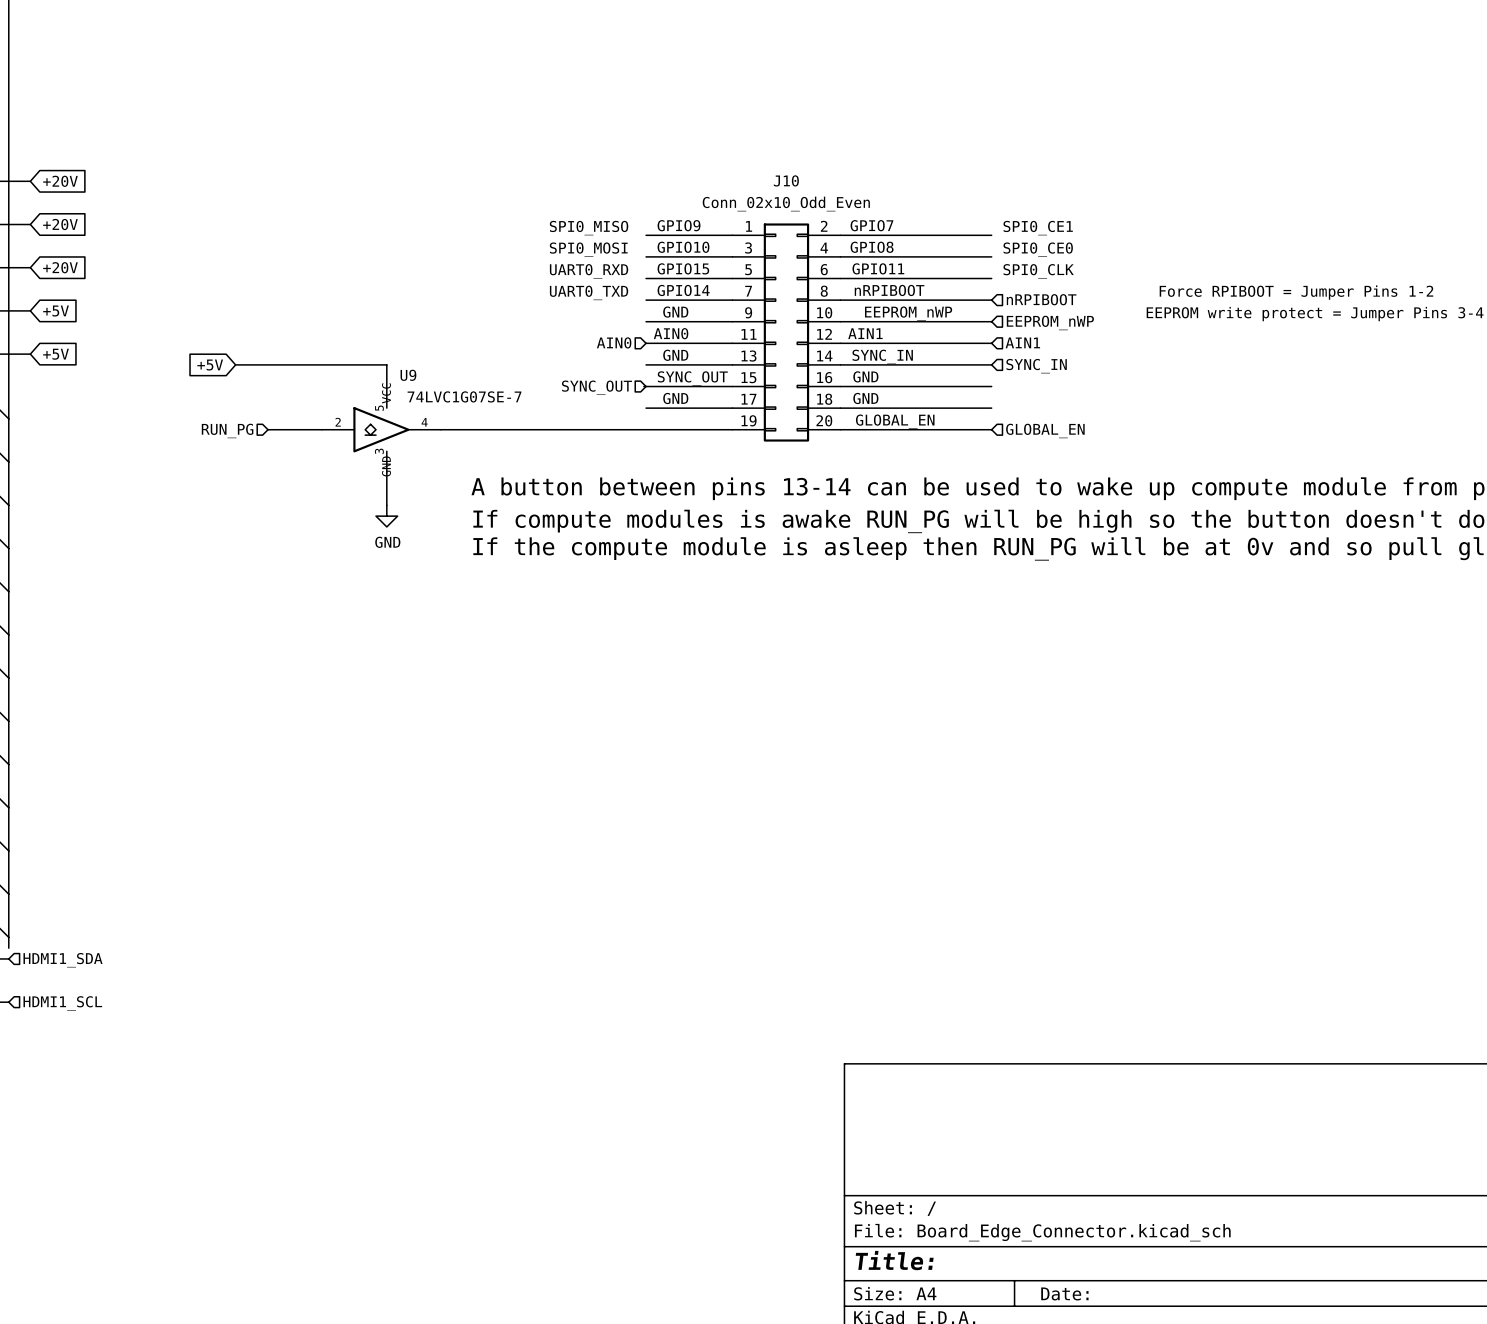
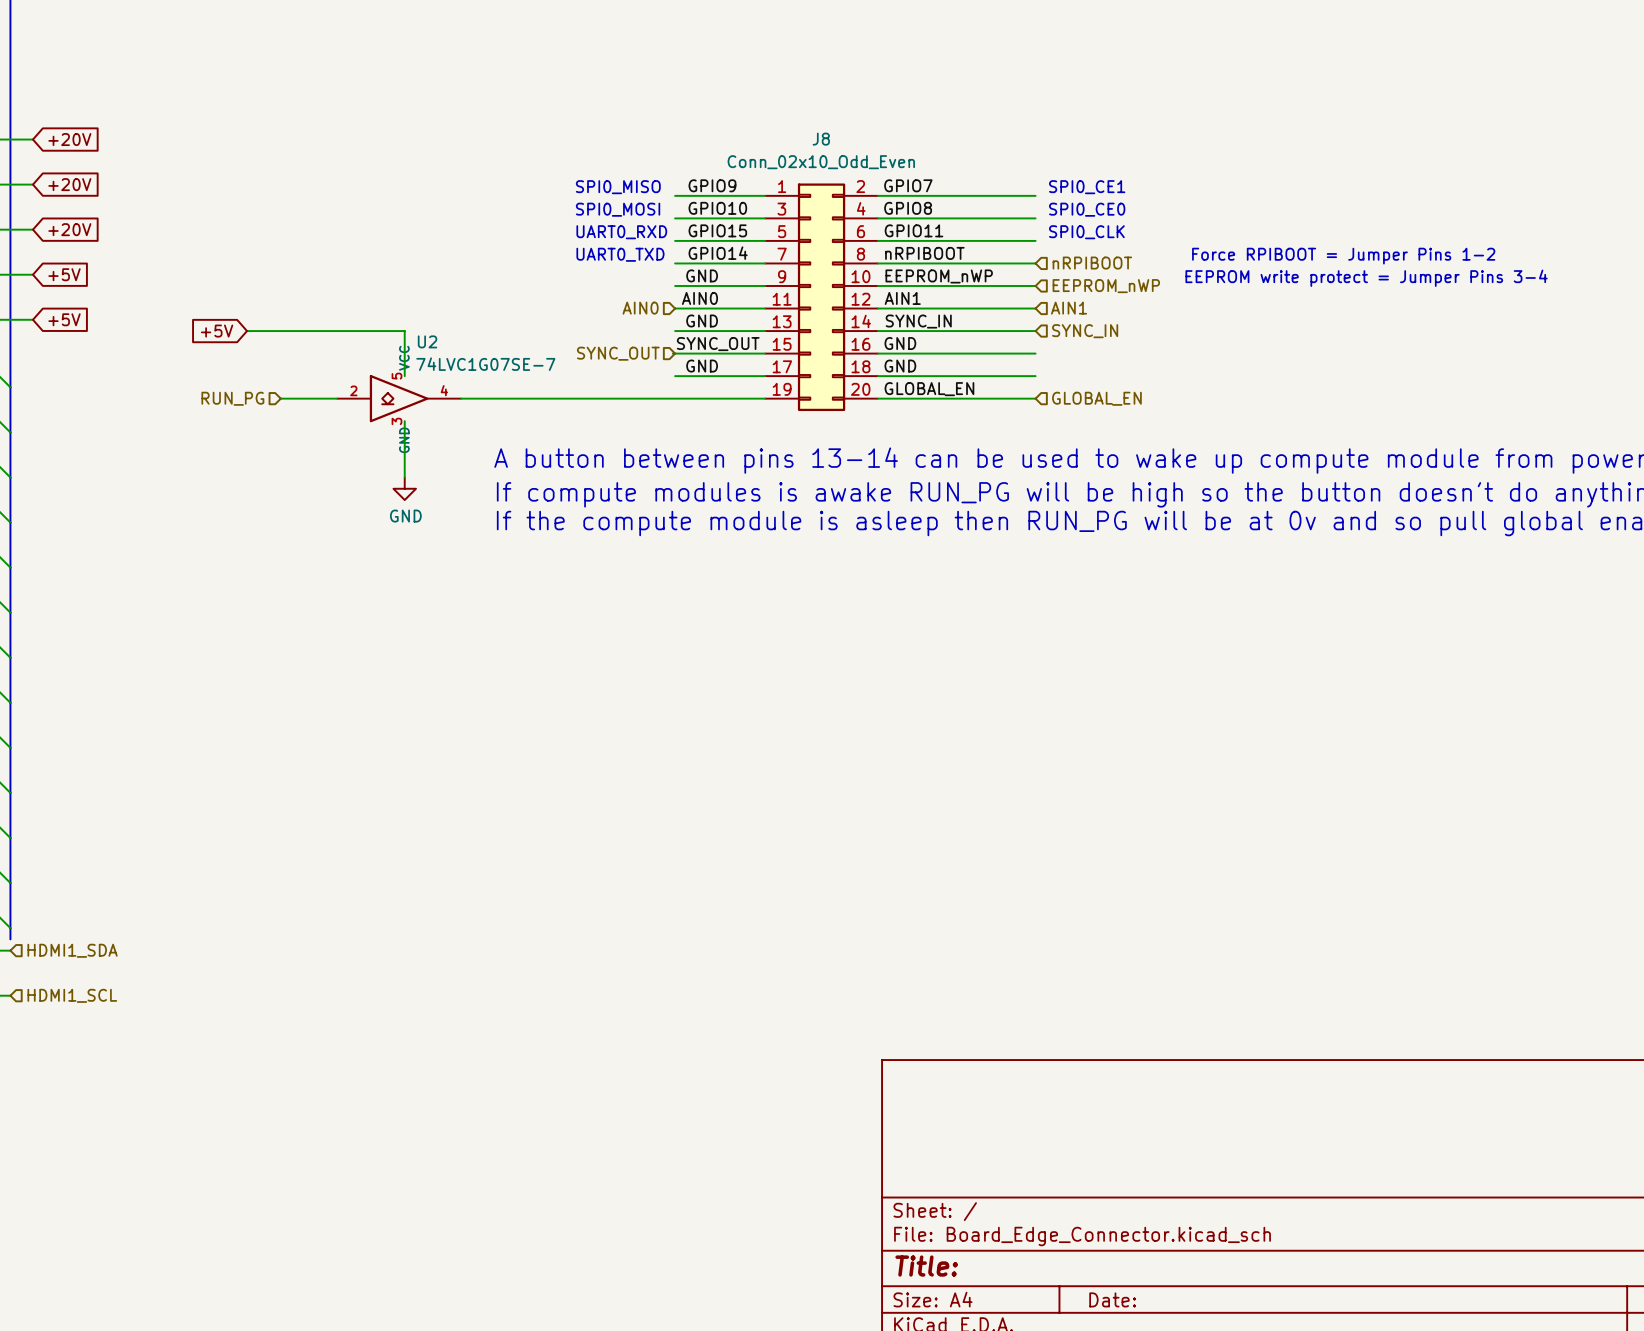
J10 name: J10 (786, 180) -> J8 (821, 139)
U9 name: U9 (408, 375) -> U2 (427, 341)

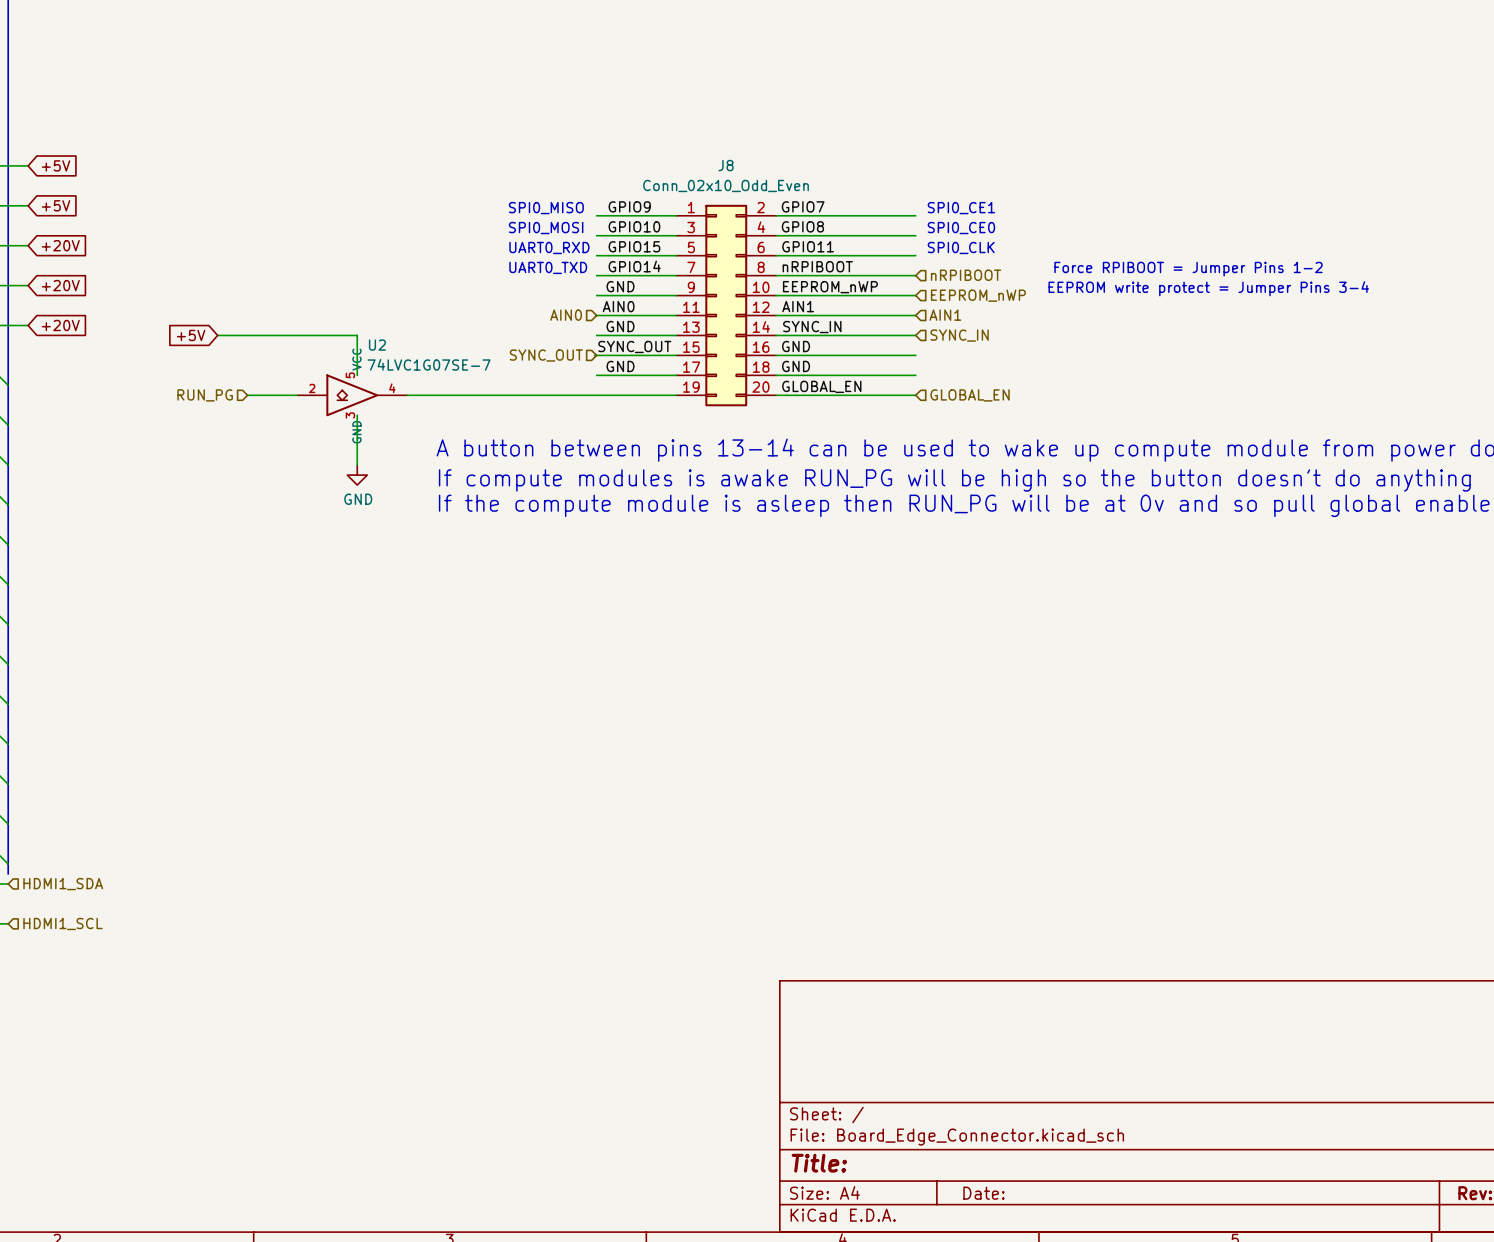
global label: +20V (69, 139) -> +5V (56, 165)
global label: +20V (69, 184) -> +5V (56, 205)
global label: +5V (64, 274) -> +20V (60, 285)
global label: +5V (64, 319) -> +20V (60, 325)

